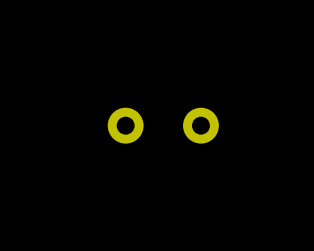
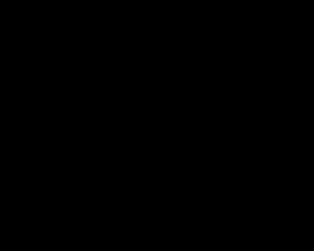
part: (163, 125) -> none

